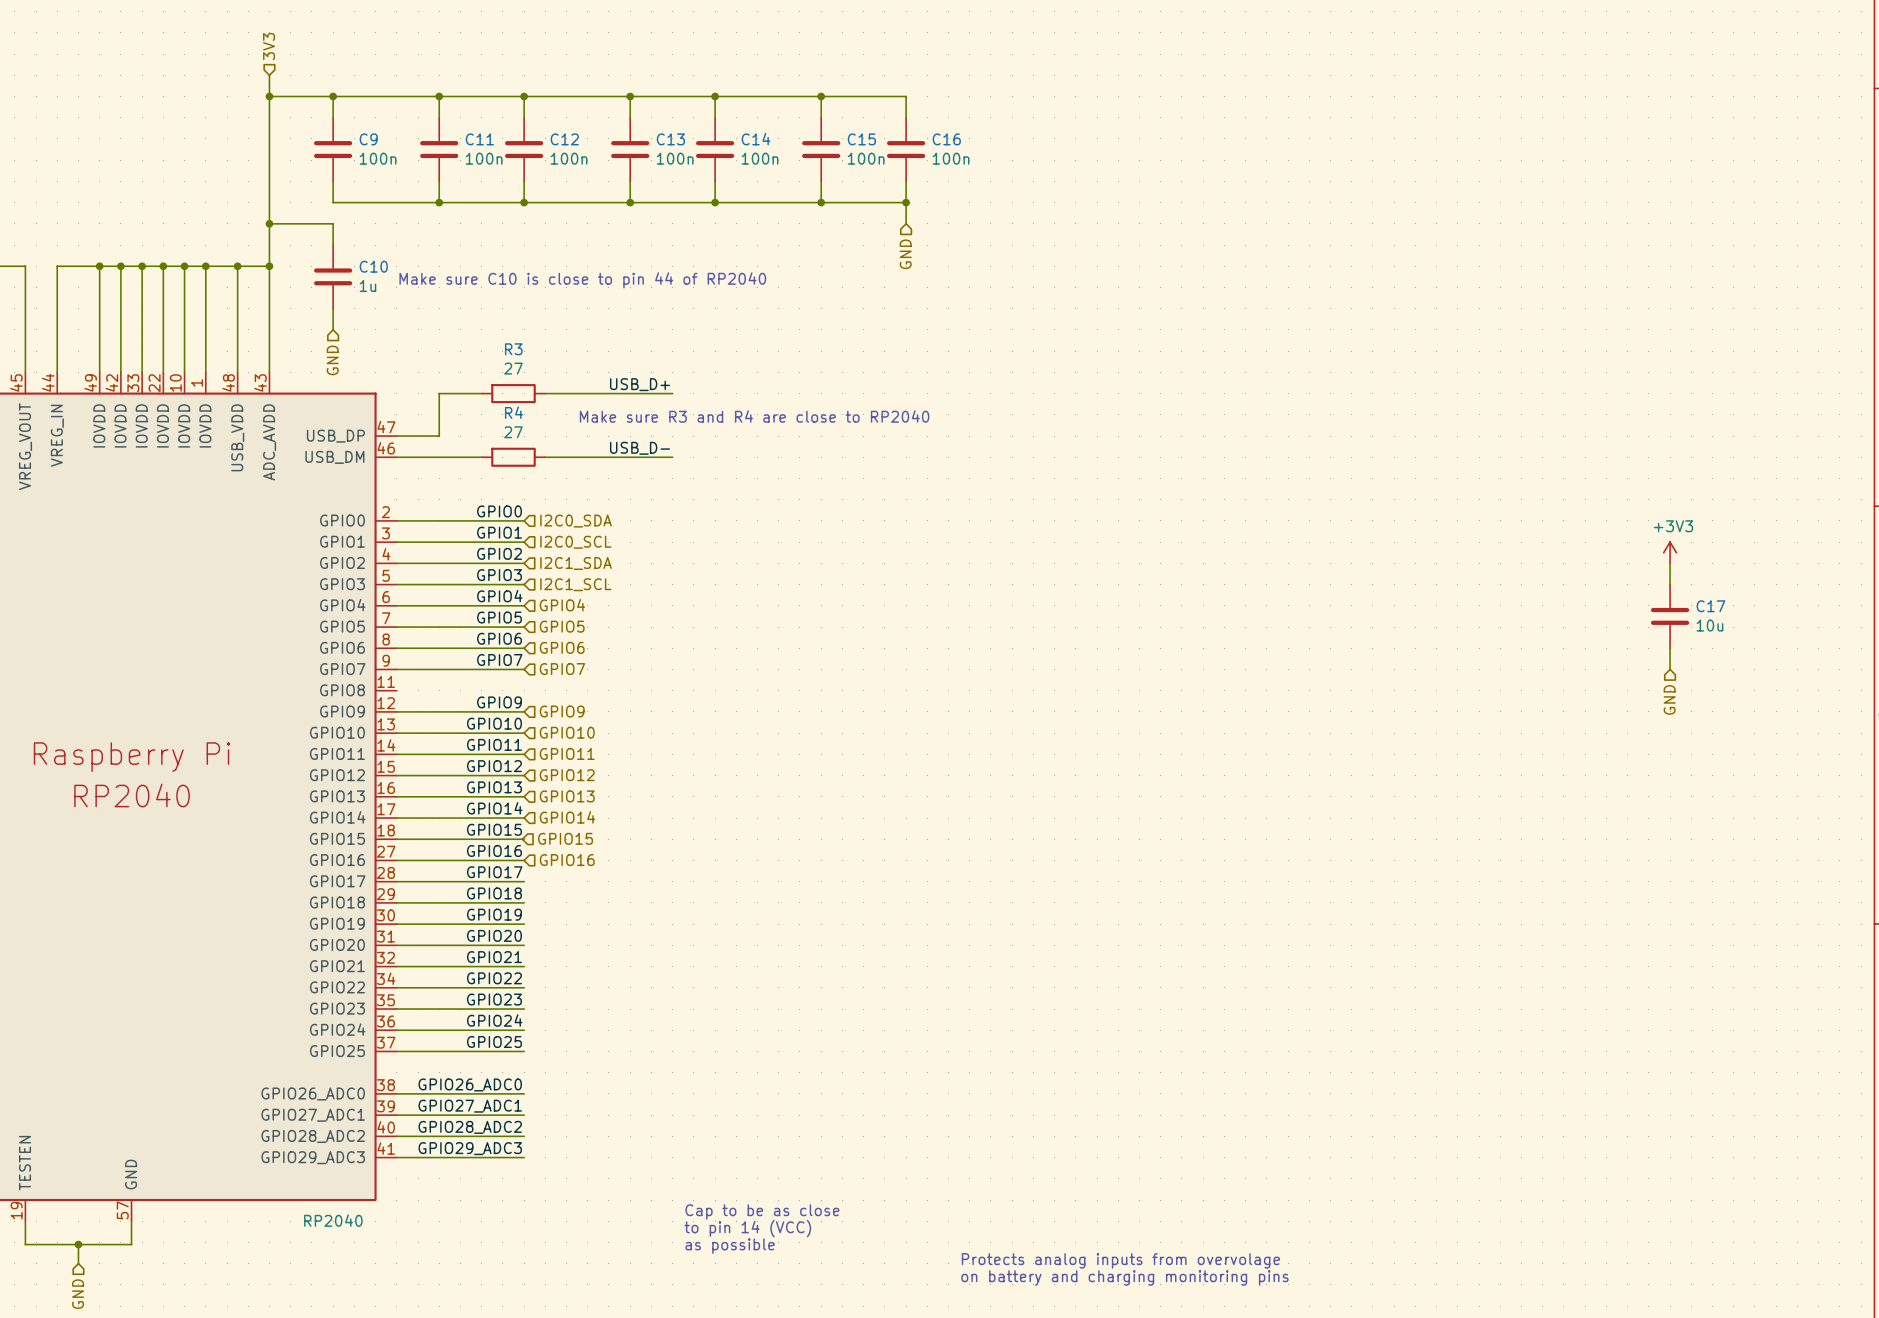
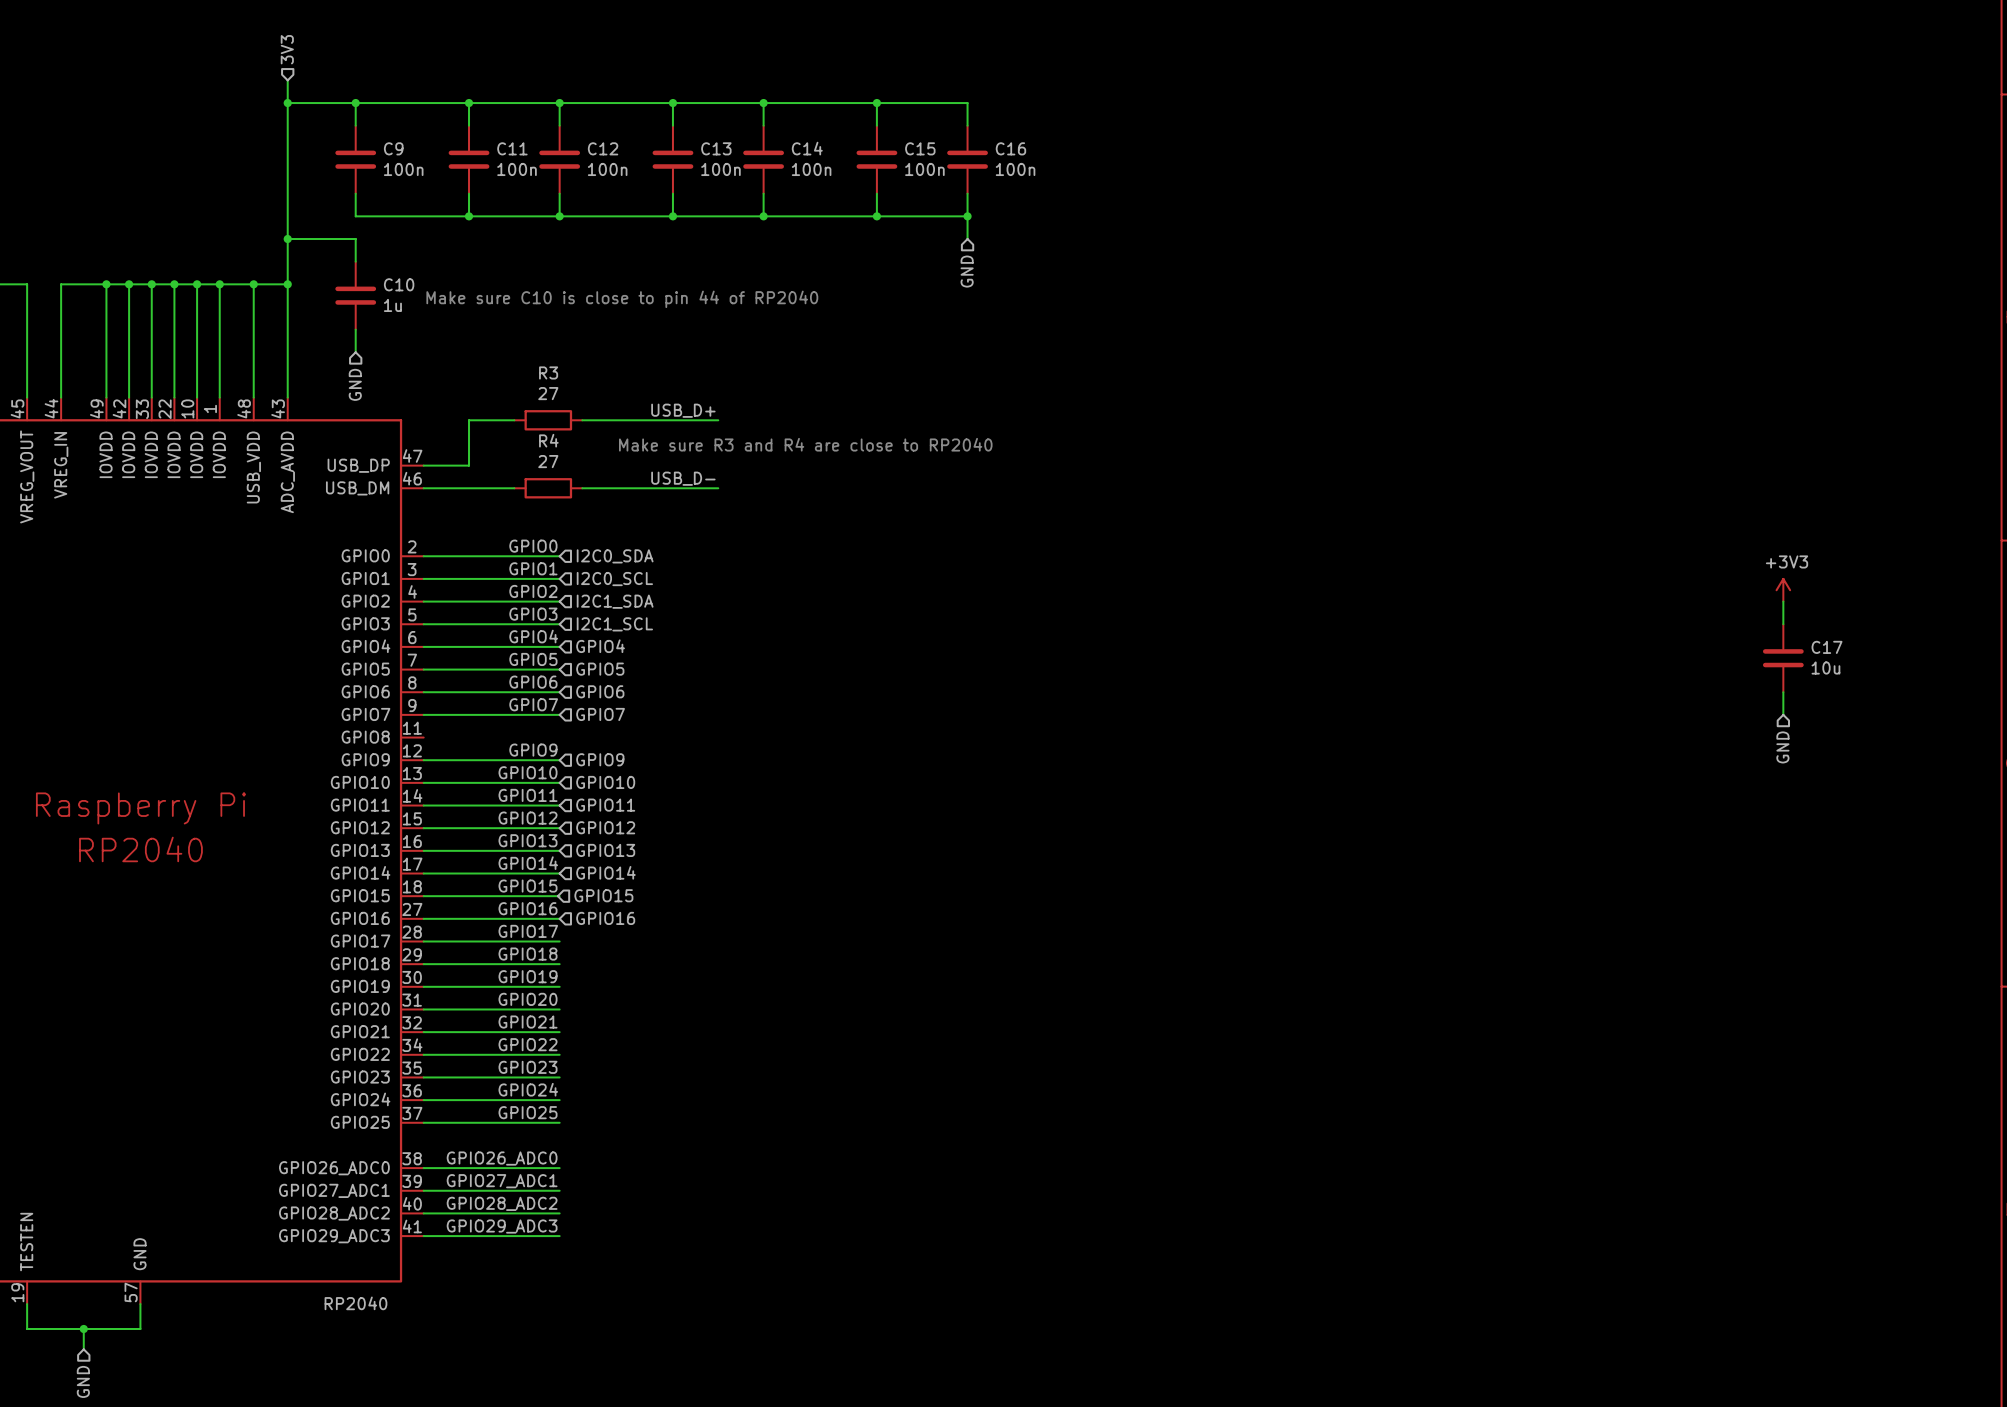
text: Cap to be as close (762, 1211) -> none
text: to pin 14 (VCC) (747, 1228) -> none
text: as possible (730, 1246) -> none
text: Protects analog inputs from overvolage (1120, 1260) -> none
text: on battery and charging monitoring pins (1124, 1277) -> none

